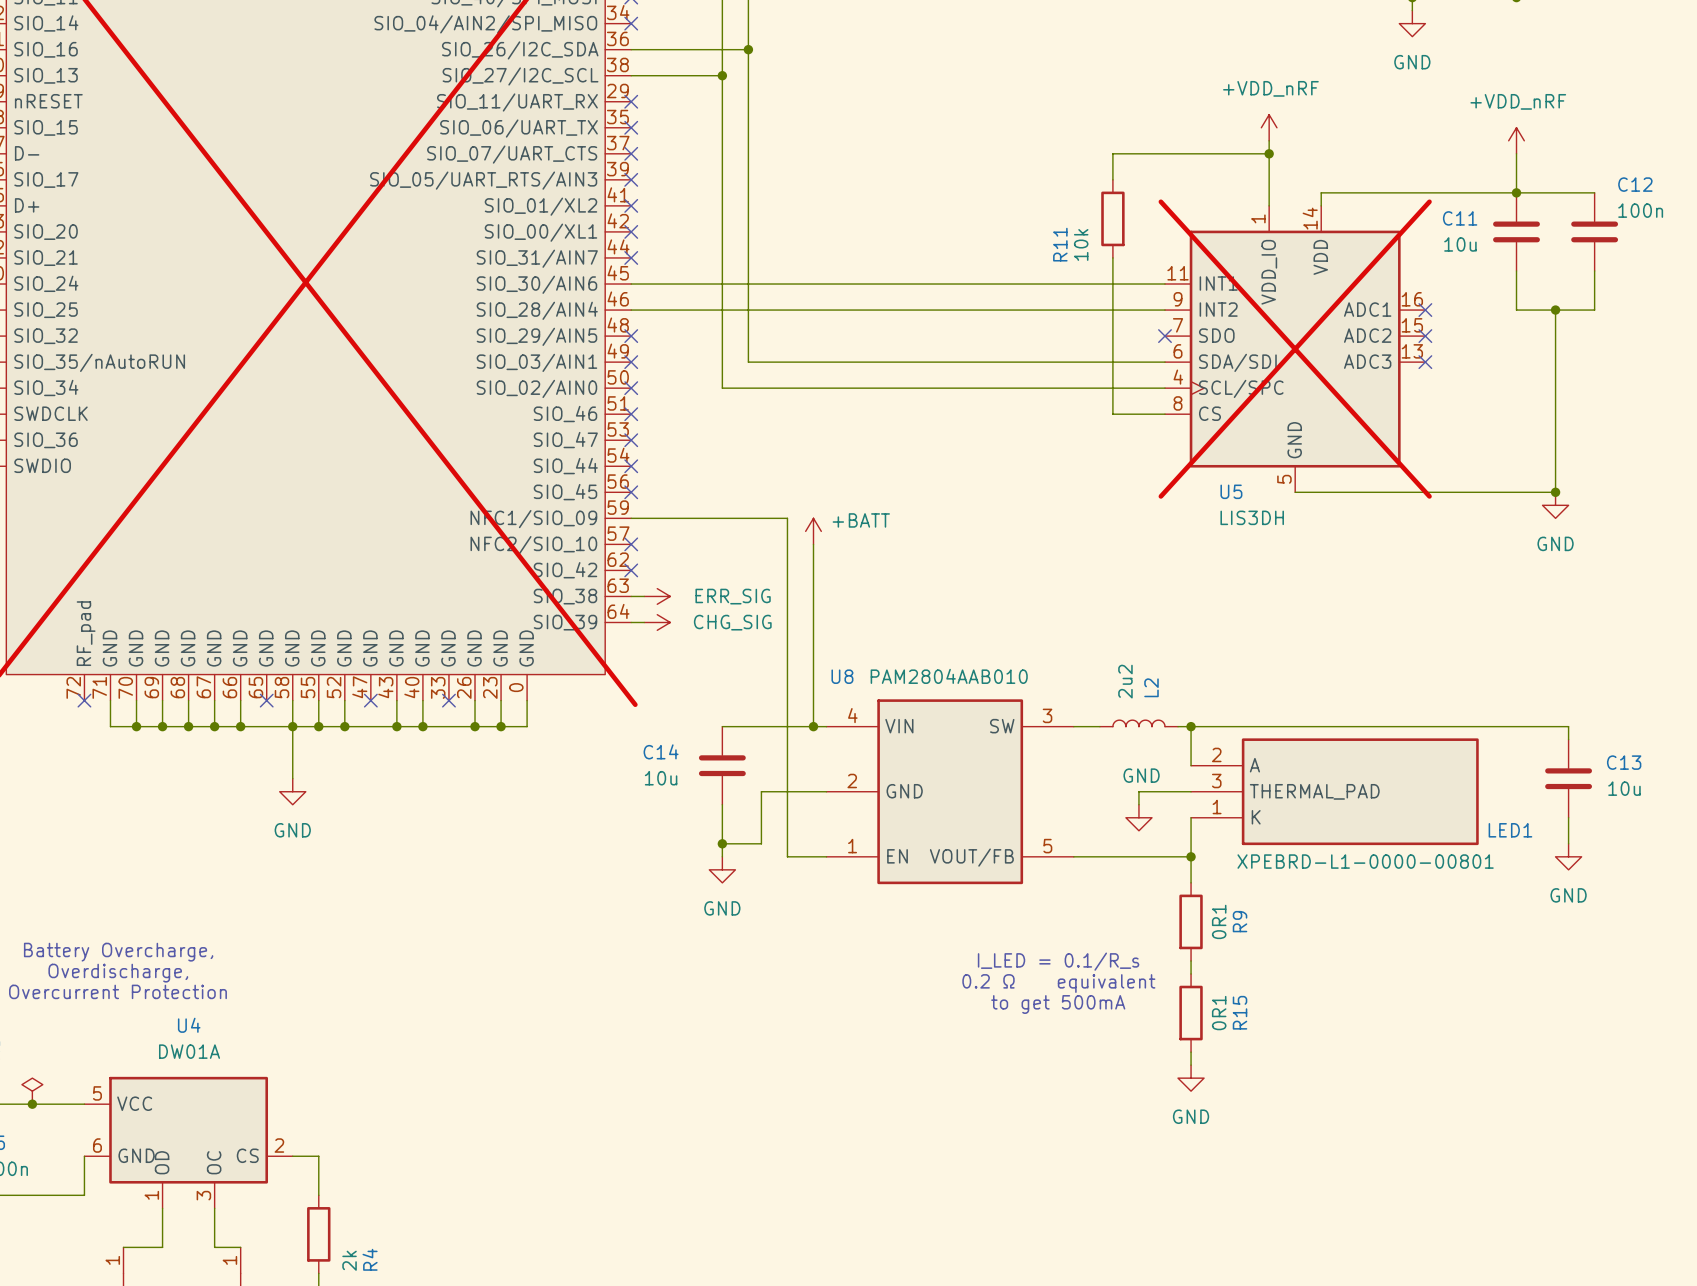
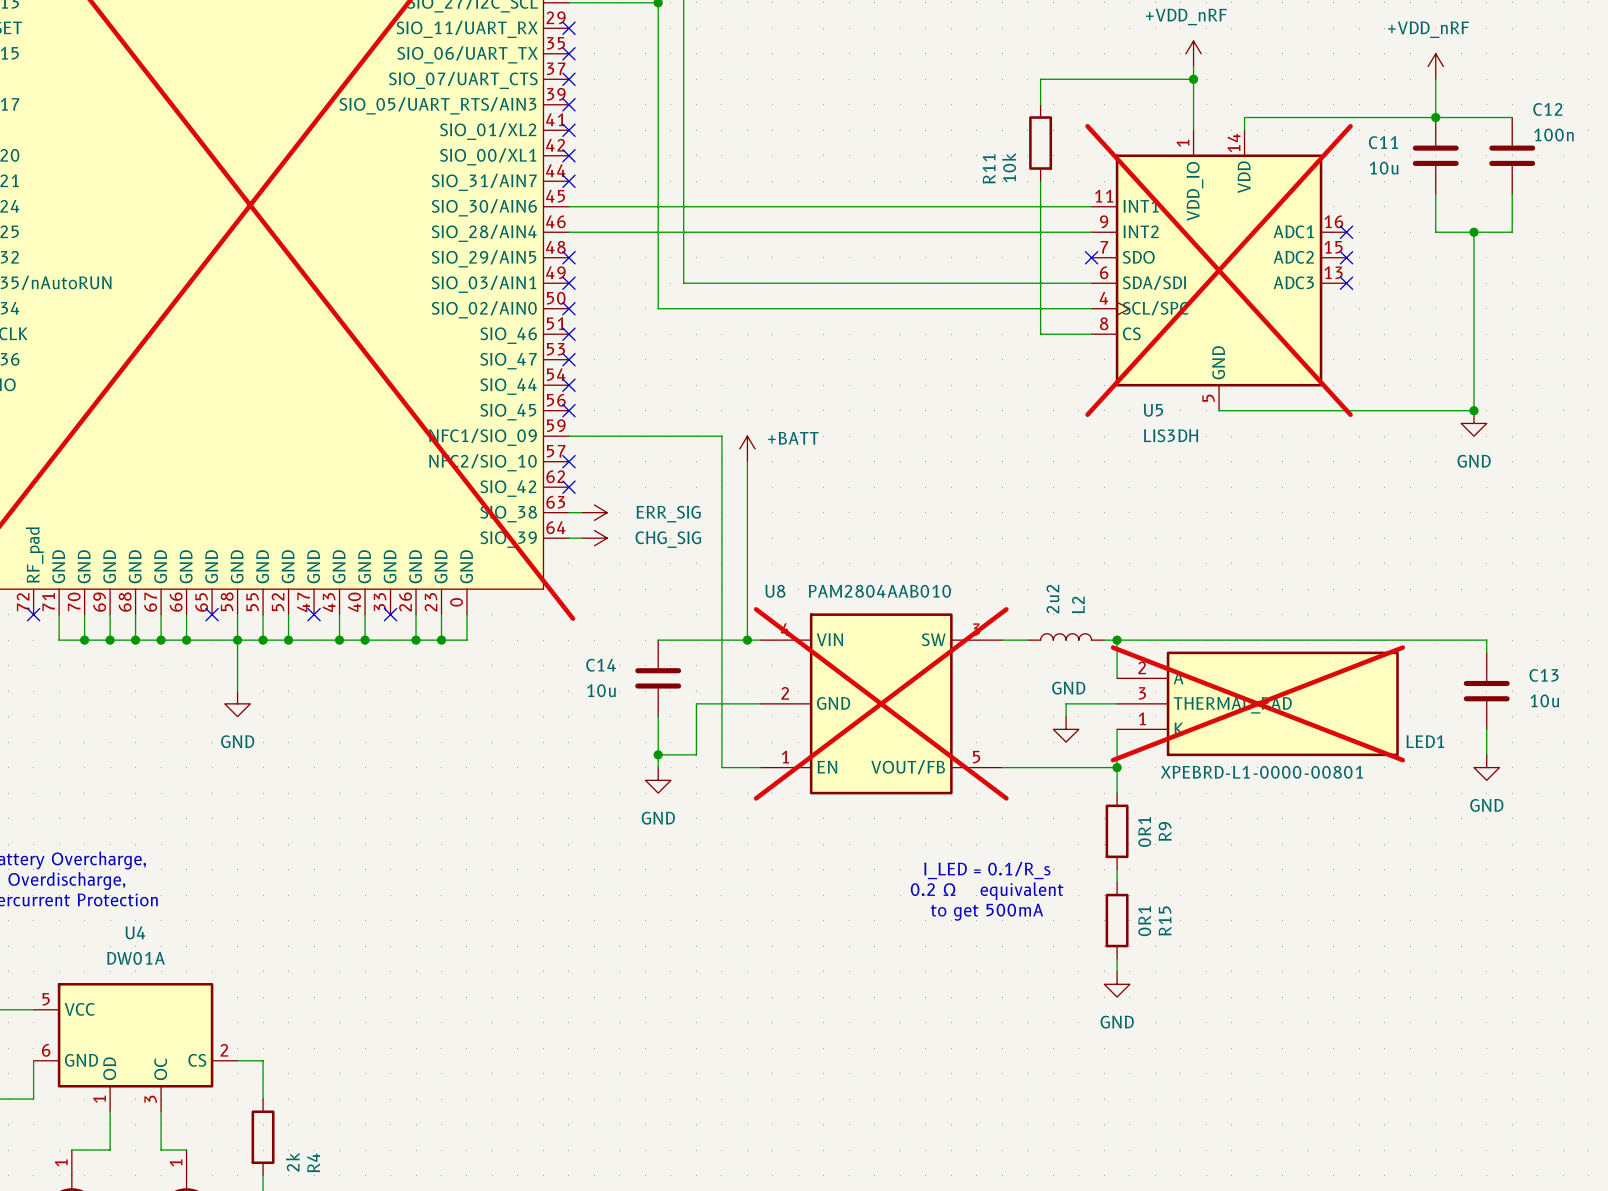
U8 do-not-place cross: none -> (881, 703)
LED1 do-not-place cross: none -> (1257, 703)

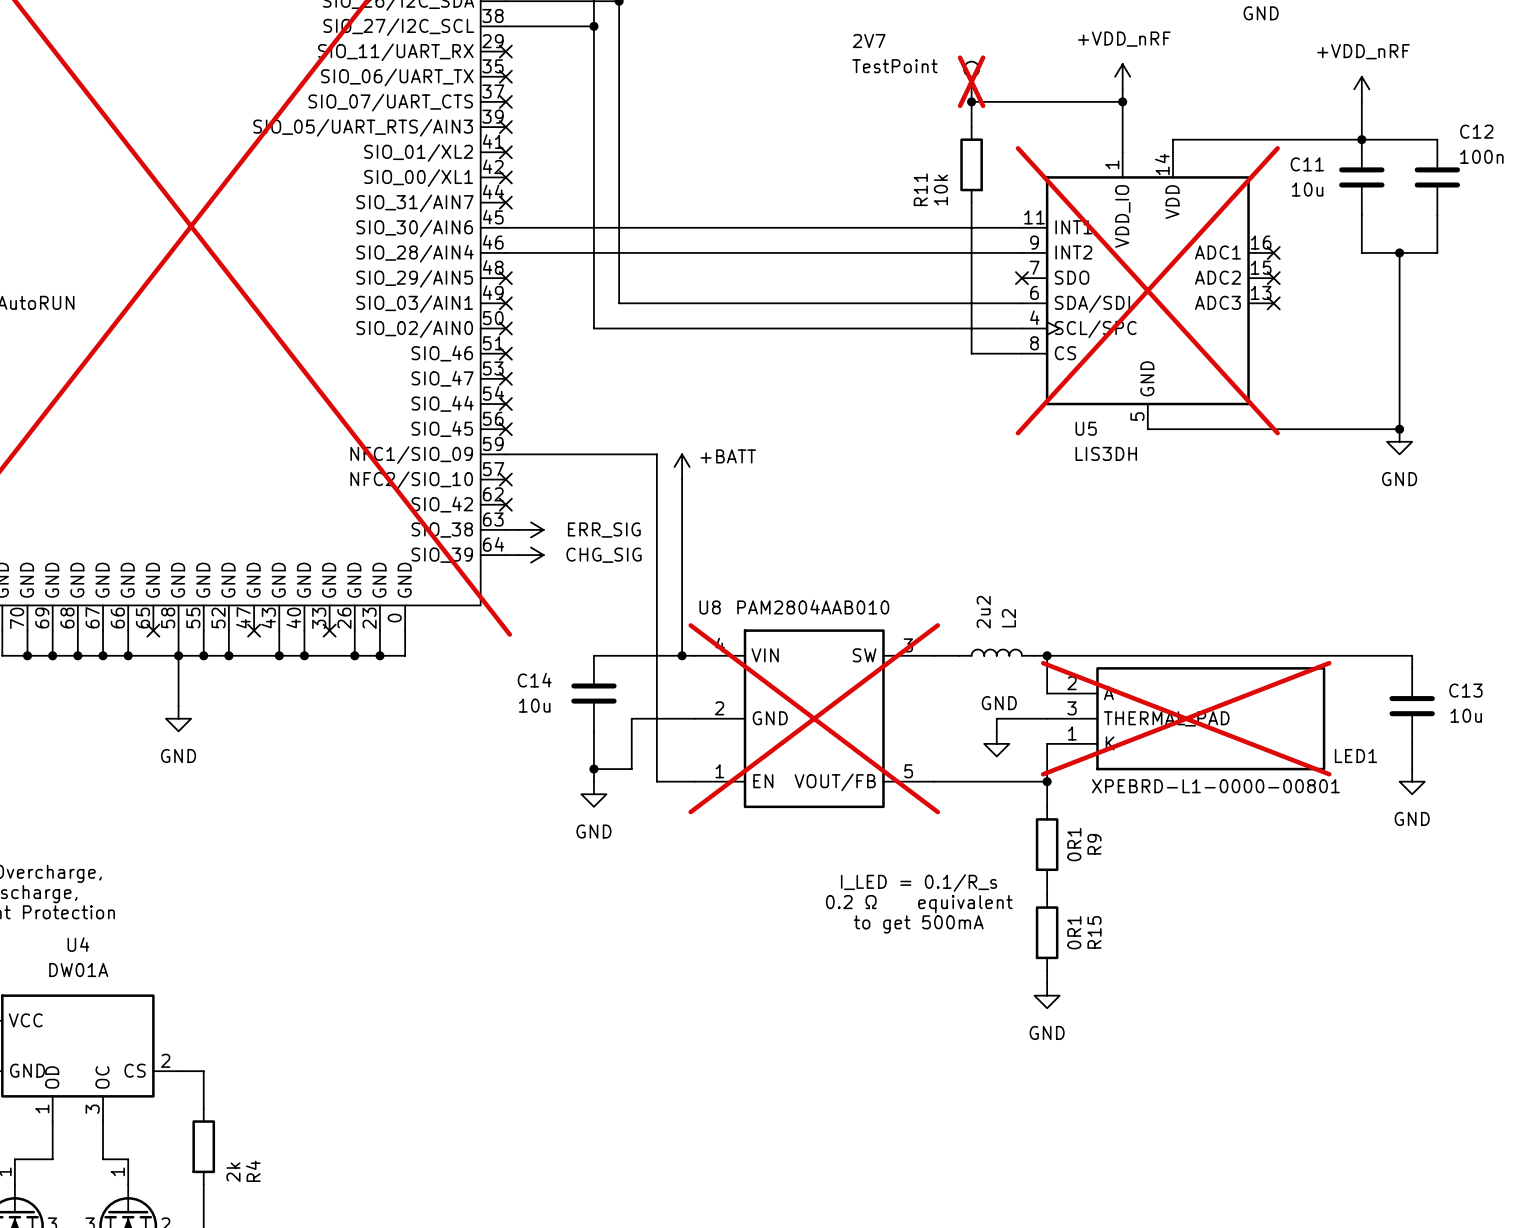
2V7: none -> TestPoint (971, 81)
junction: none -> (971, 101)

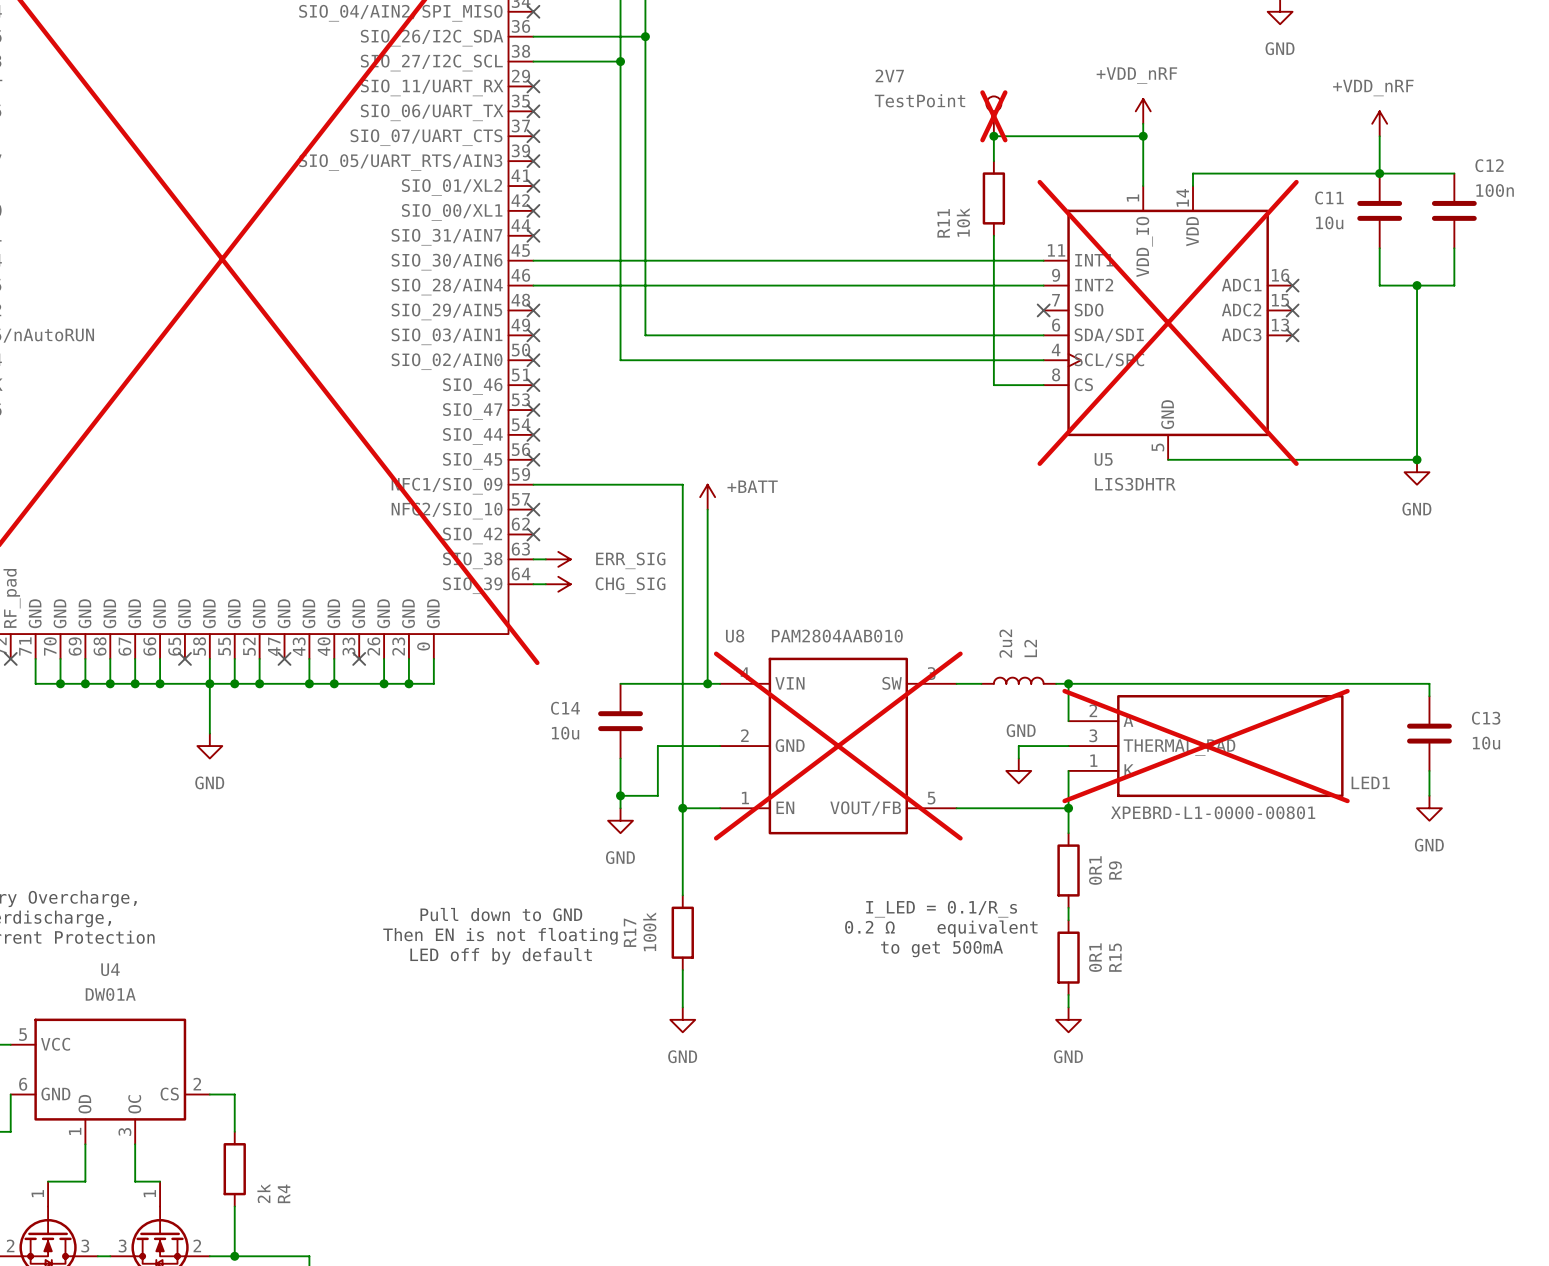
U5 value: LIS3DH (1106, 453) -> LIS3DHTR (1135, 484)
wire: none -> (682, 808) (682, 895)
junction: none -> (682, 808)
text: none -> Pull down to GND (501, 914)
R17: none -> 100k (682, 932)
text: none -> Then EN is not floating (500, 936)
text: none -> LED off by default (501, 956)
wire: none -> (682, 970) (682, 1007)
power symbol: none -> GND (682, 1019)

